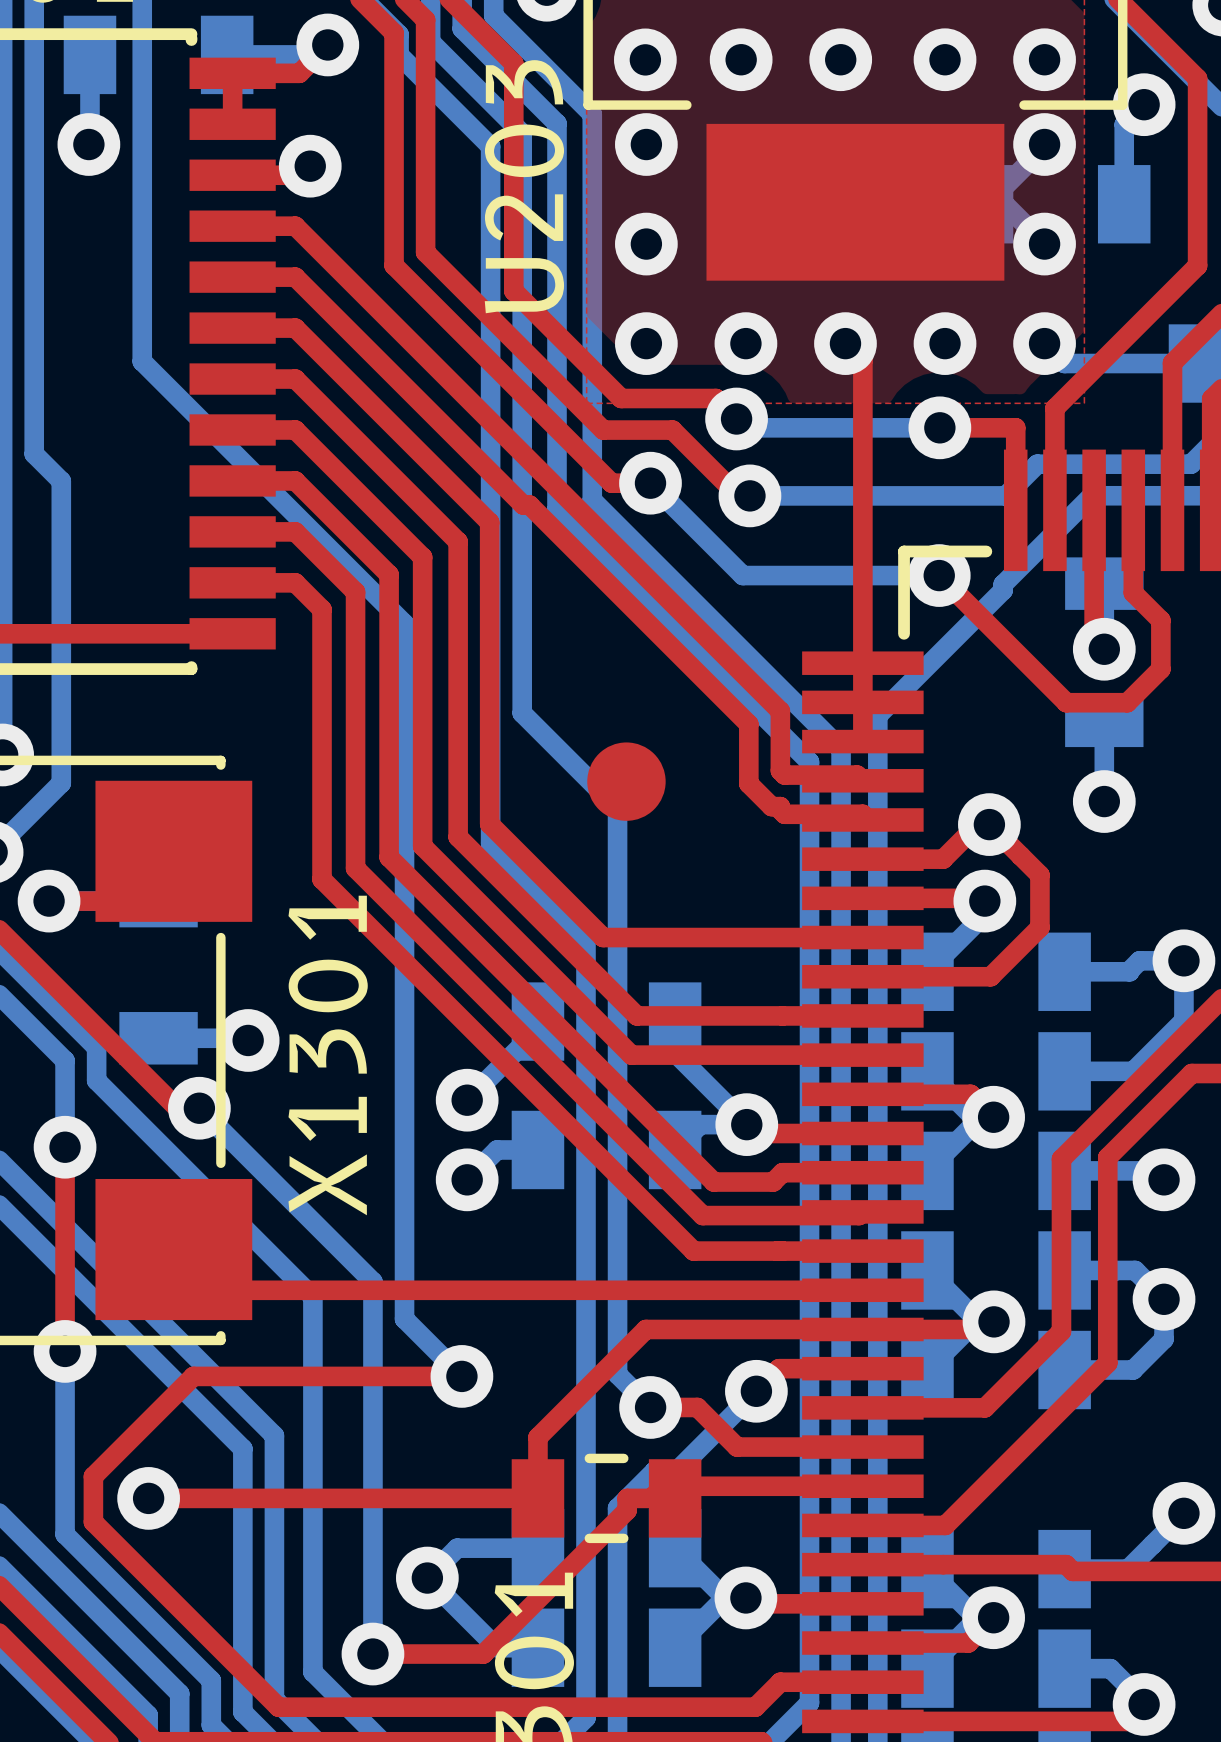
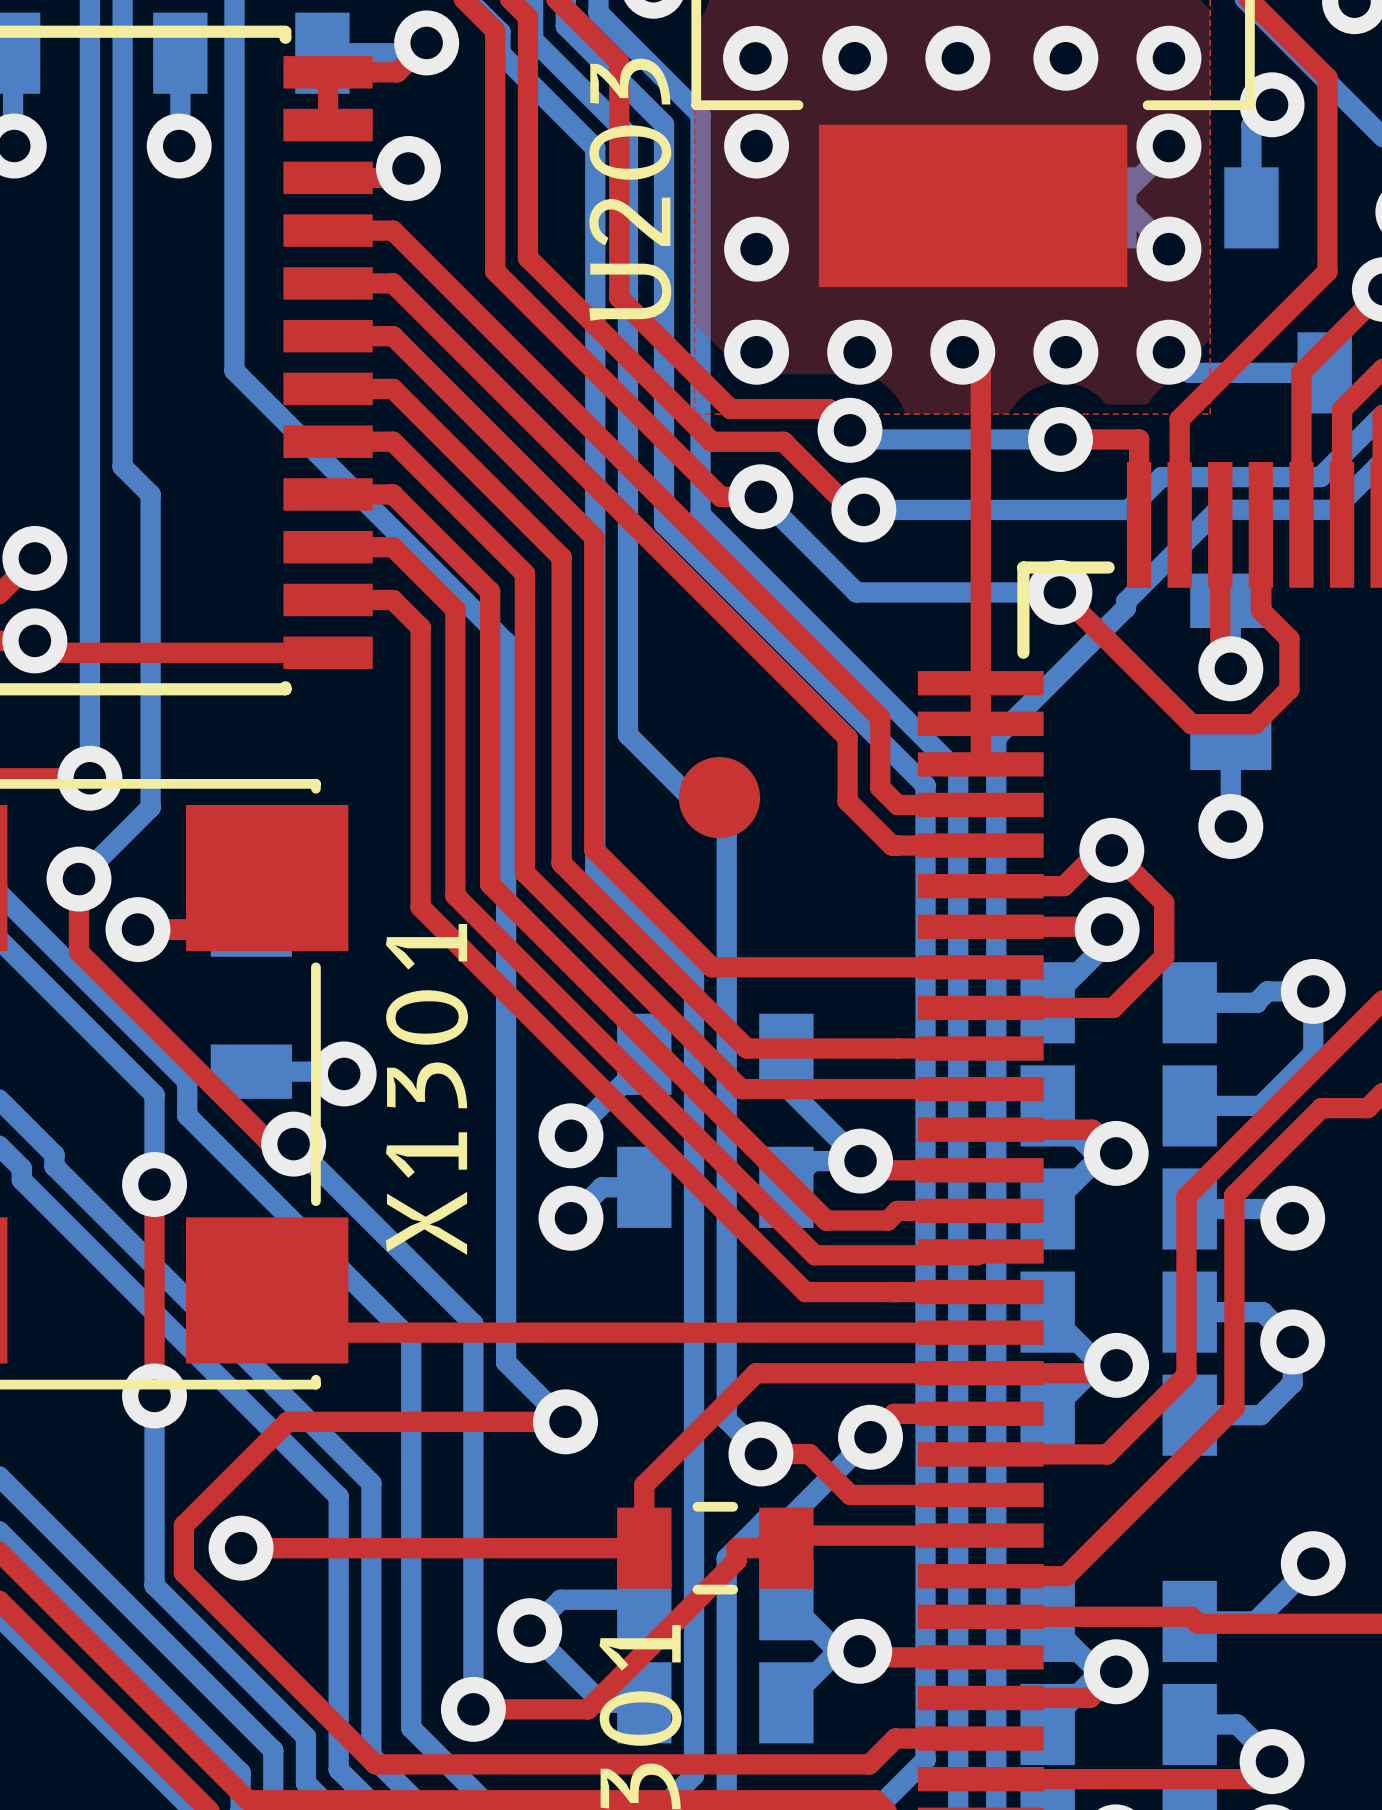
top track: (295, 277) (523, 505) (529, 505) (748, 724) (748, 783) (771, 806) (780, 806) (780, 809) (784, 814) (862, 814) (862, 819) -> (393, 283) (847, 737) (847, 801) (891, 845) (980, 845)
top track: (765, 696) (780, 711) (780, 770) (784, 775) (857, 775) (862, 780) -> (880, 717) (880, 787) (897, 804) (980, 804)
part position: (626, 781) -> (719, 797)

